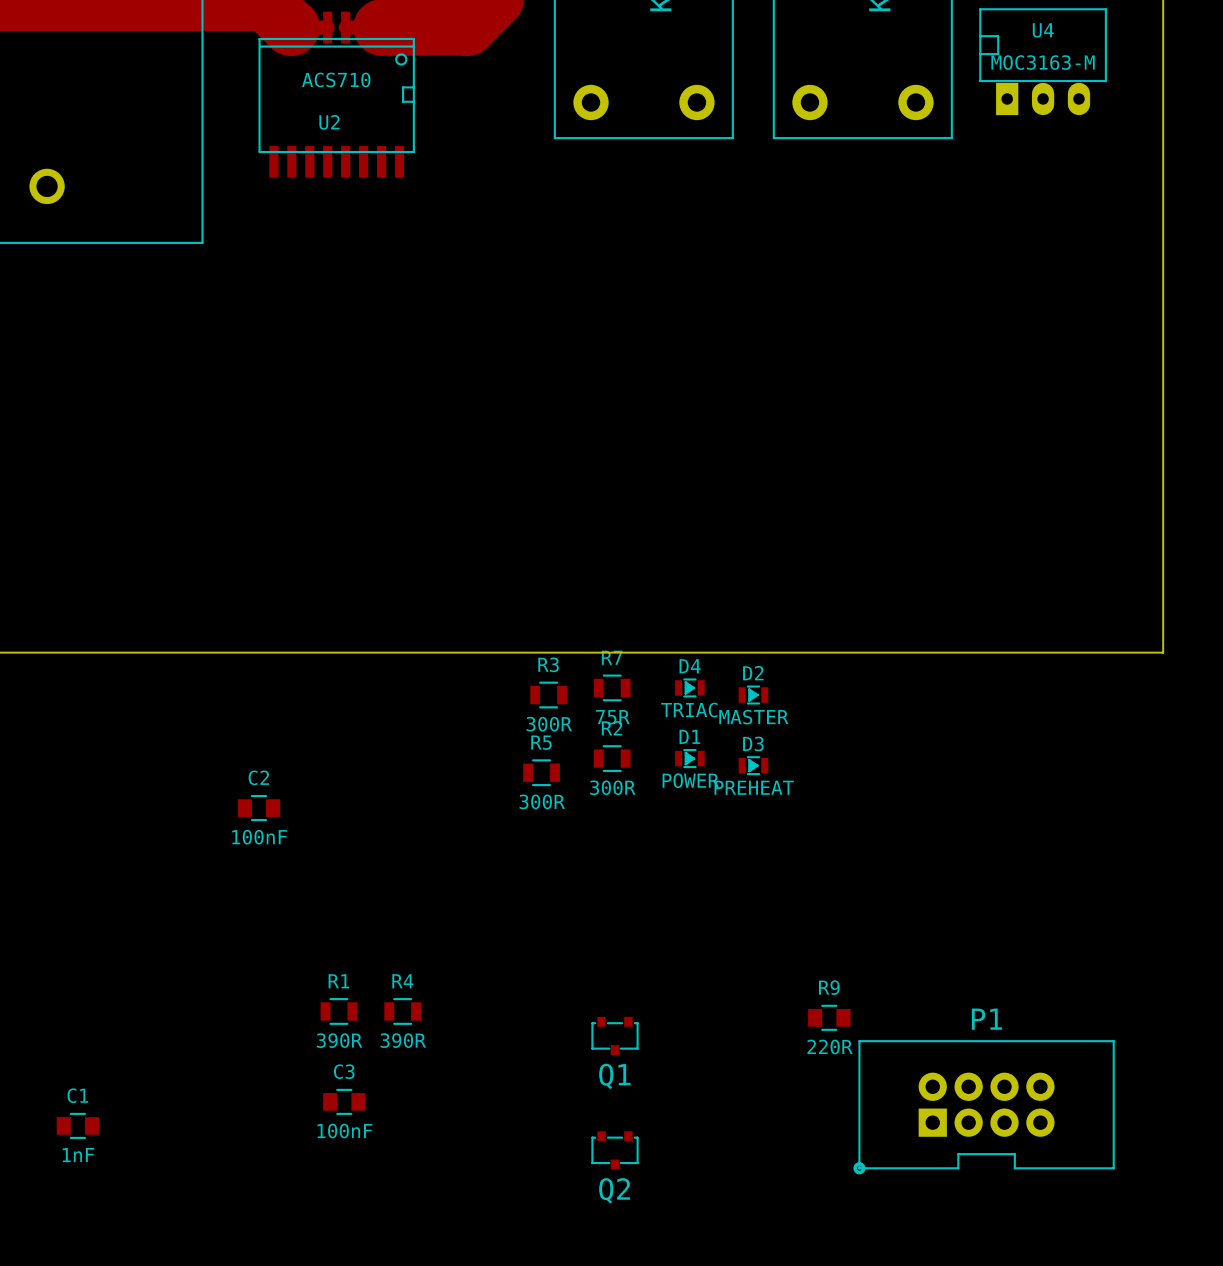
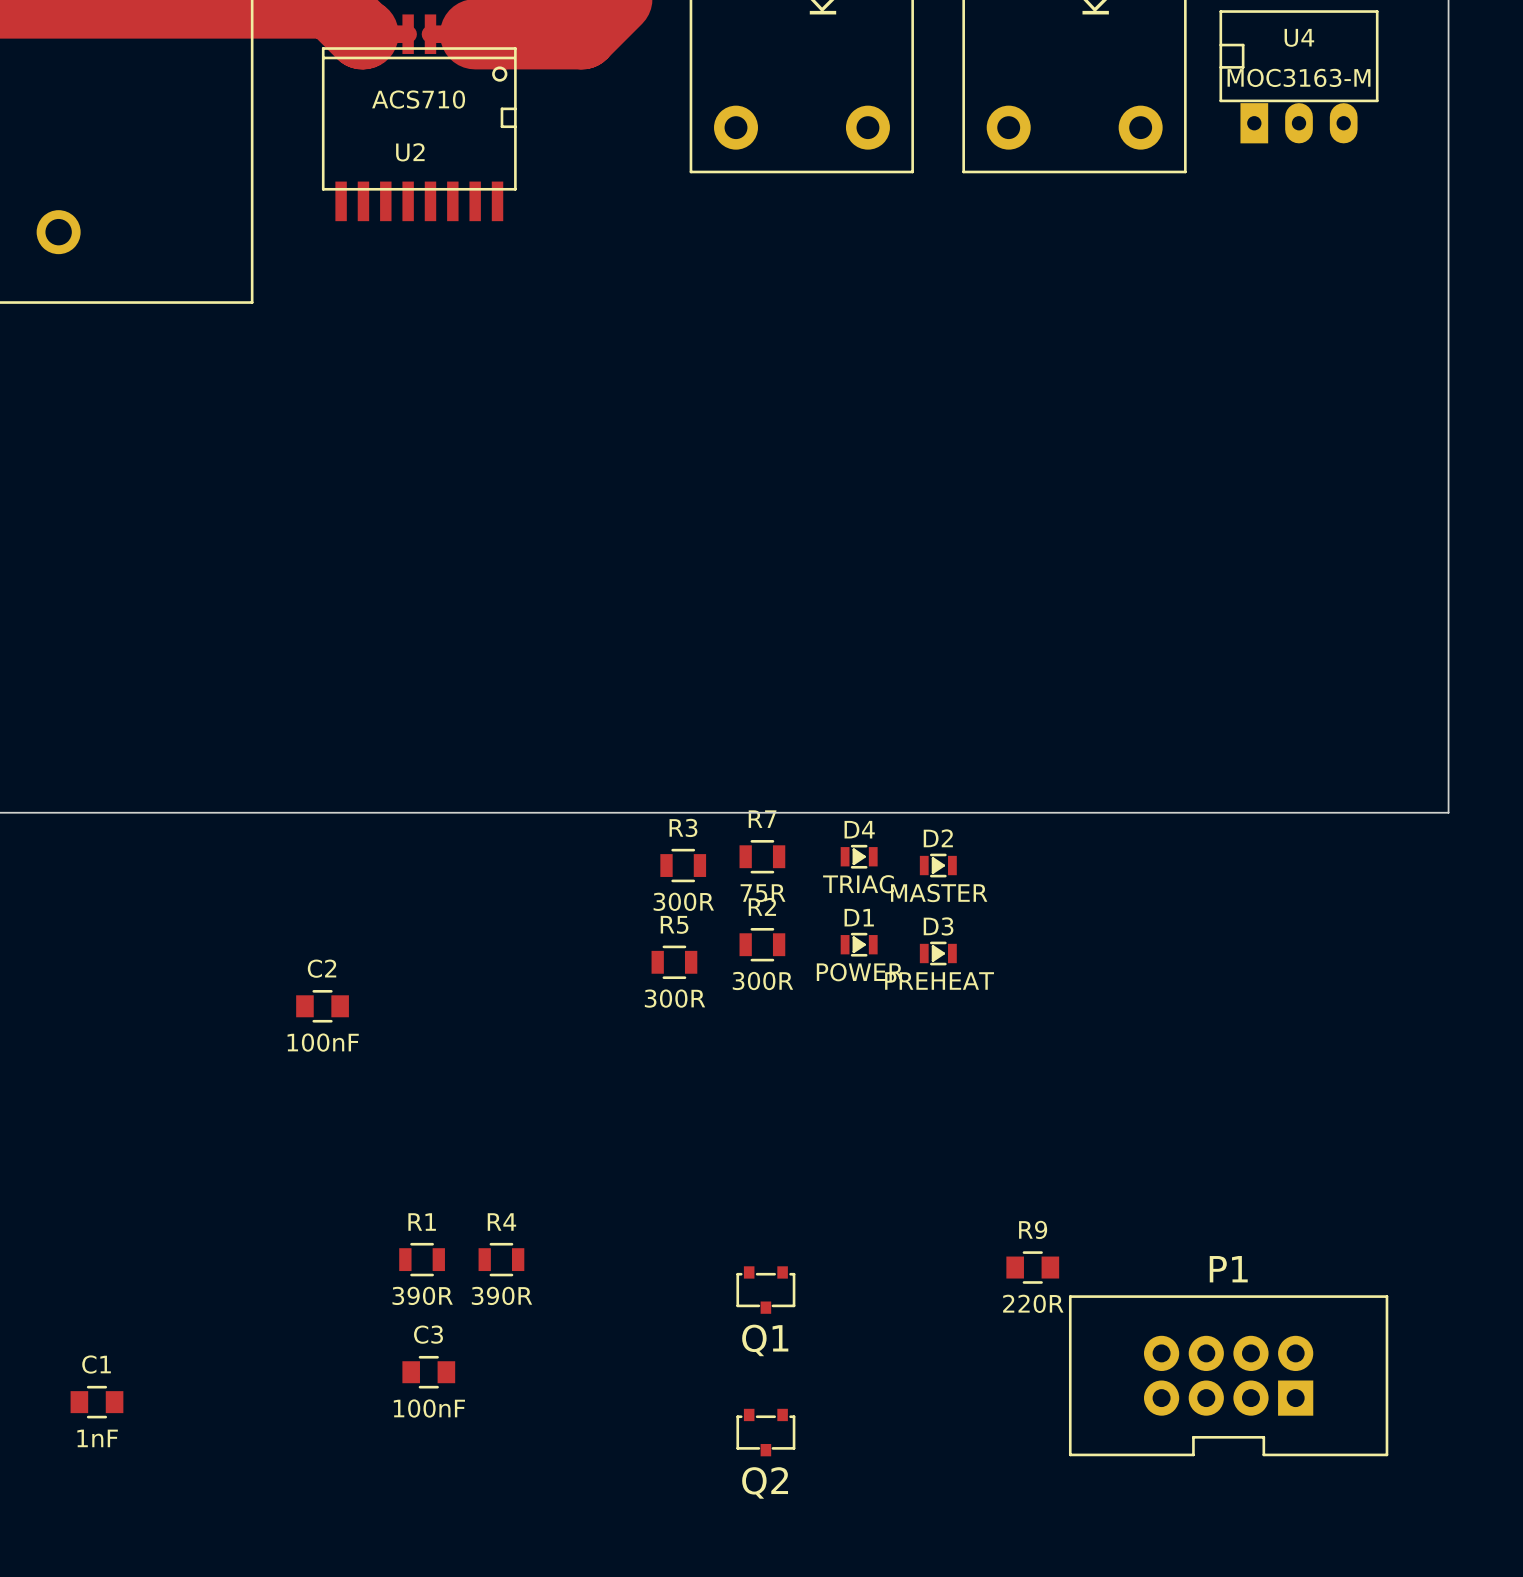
P1 footprint: [853, 1040, 1115, 1175] -> [1068, 1295, 1389, 1457]

